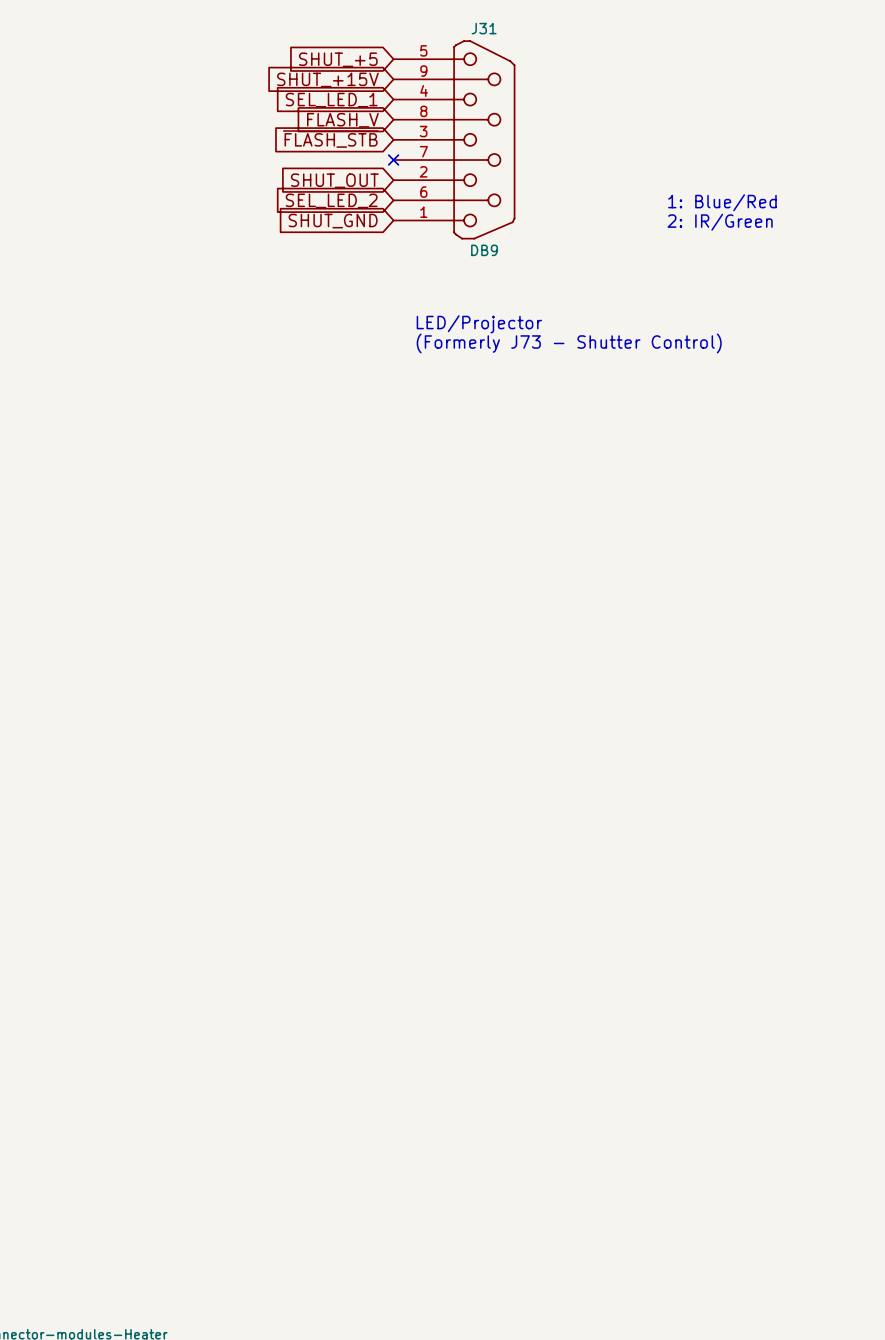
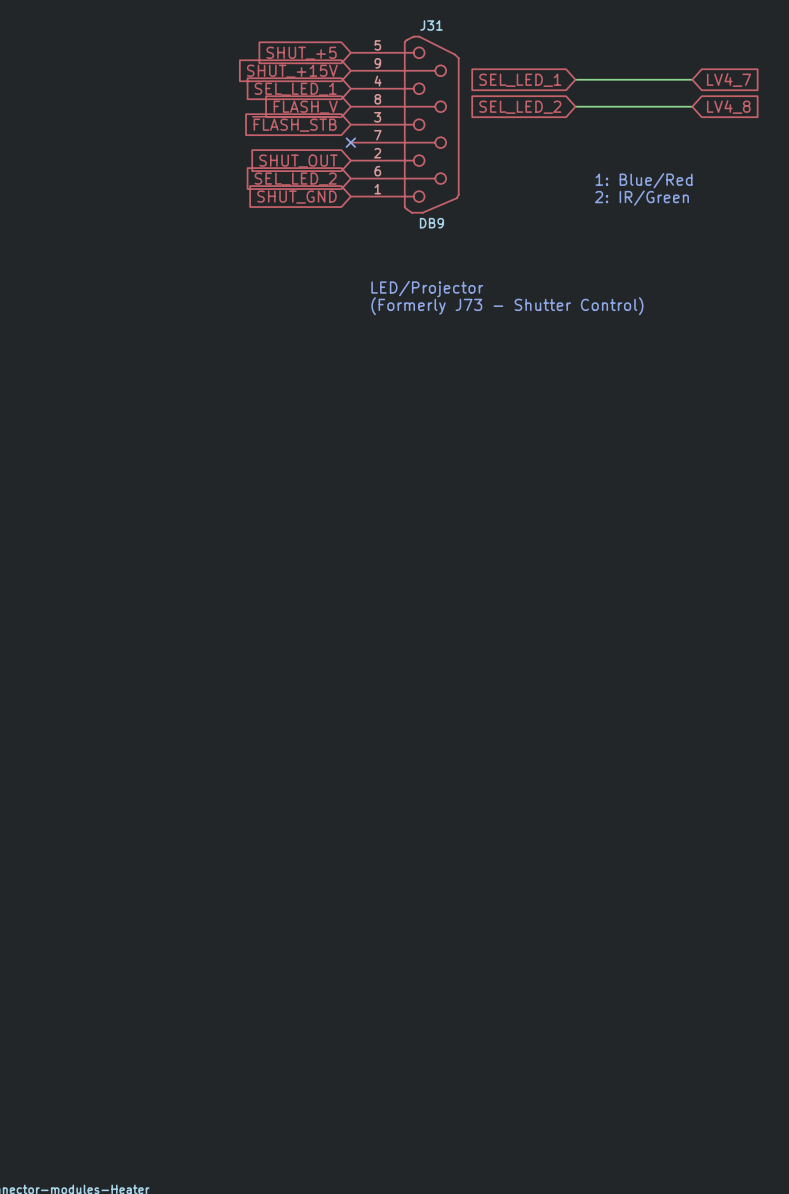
wire: none -> (575, 79) (692, 79)
global label: none -> LV4_7 (729, 80)
global label: none -> SEL_LED_1 (520, 80)
wire: none -> (575, 106) (692, 106)
global label: none -> LV4_8 (728, 106)
global label: none -> SEL_LED_2 (520, 107)

